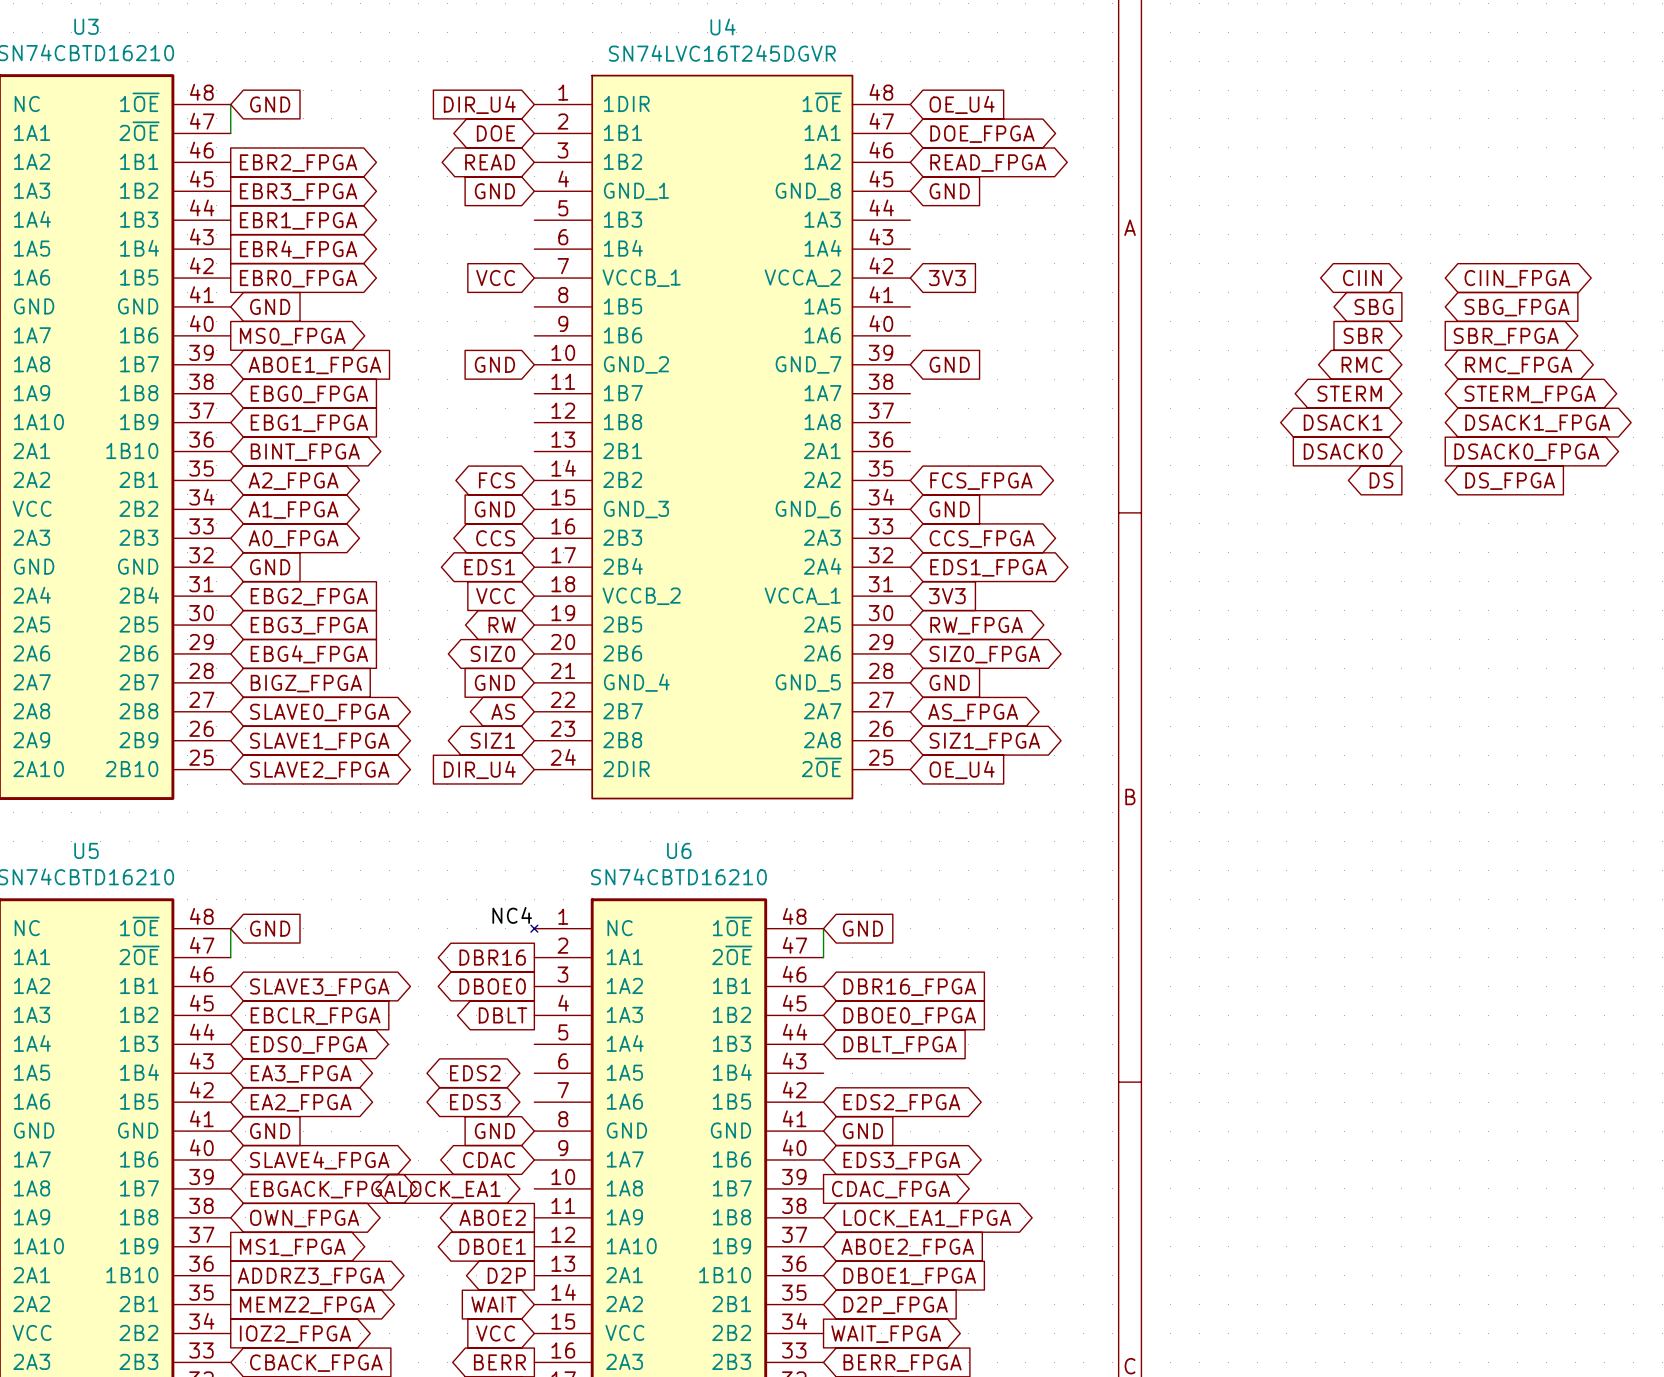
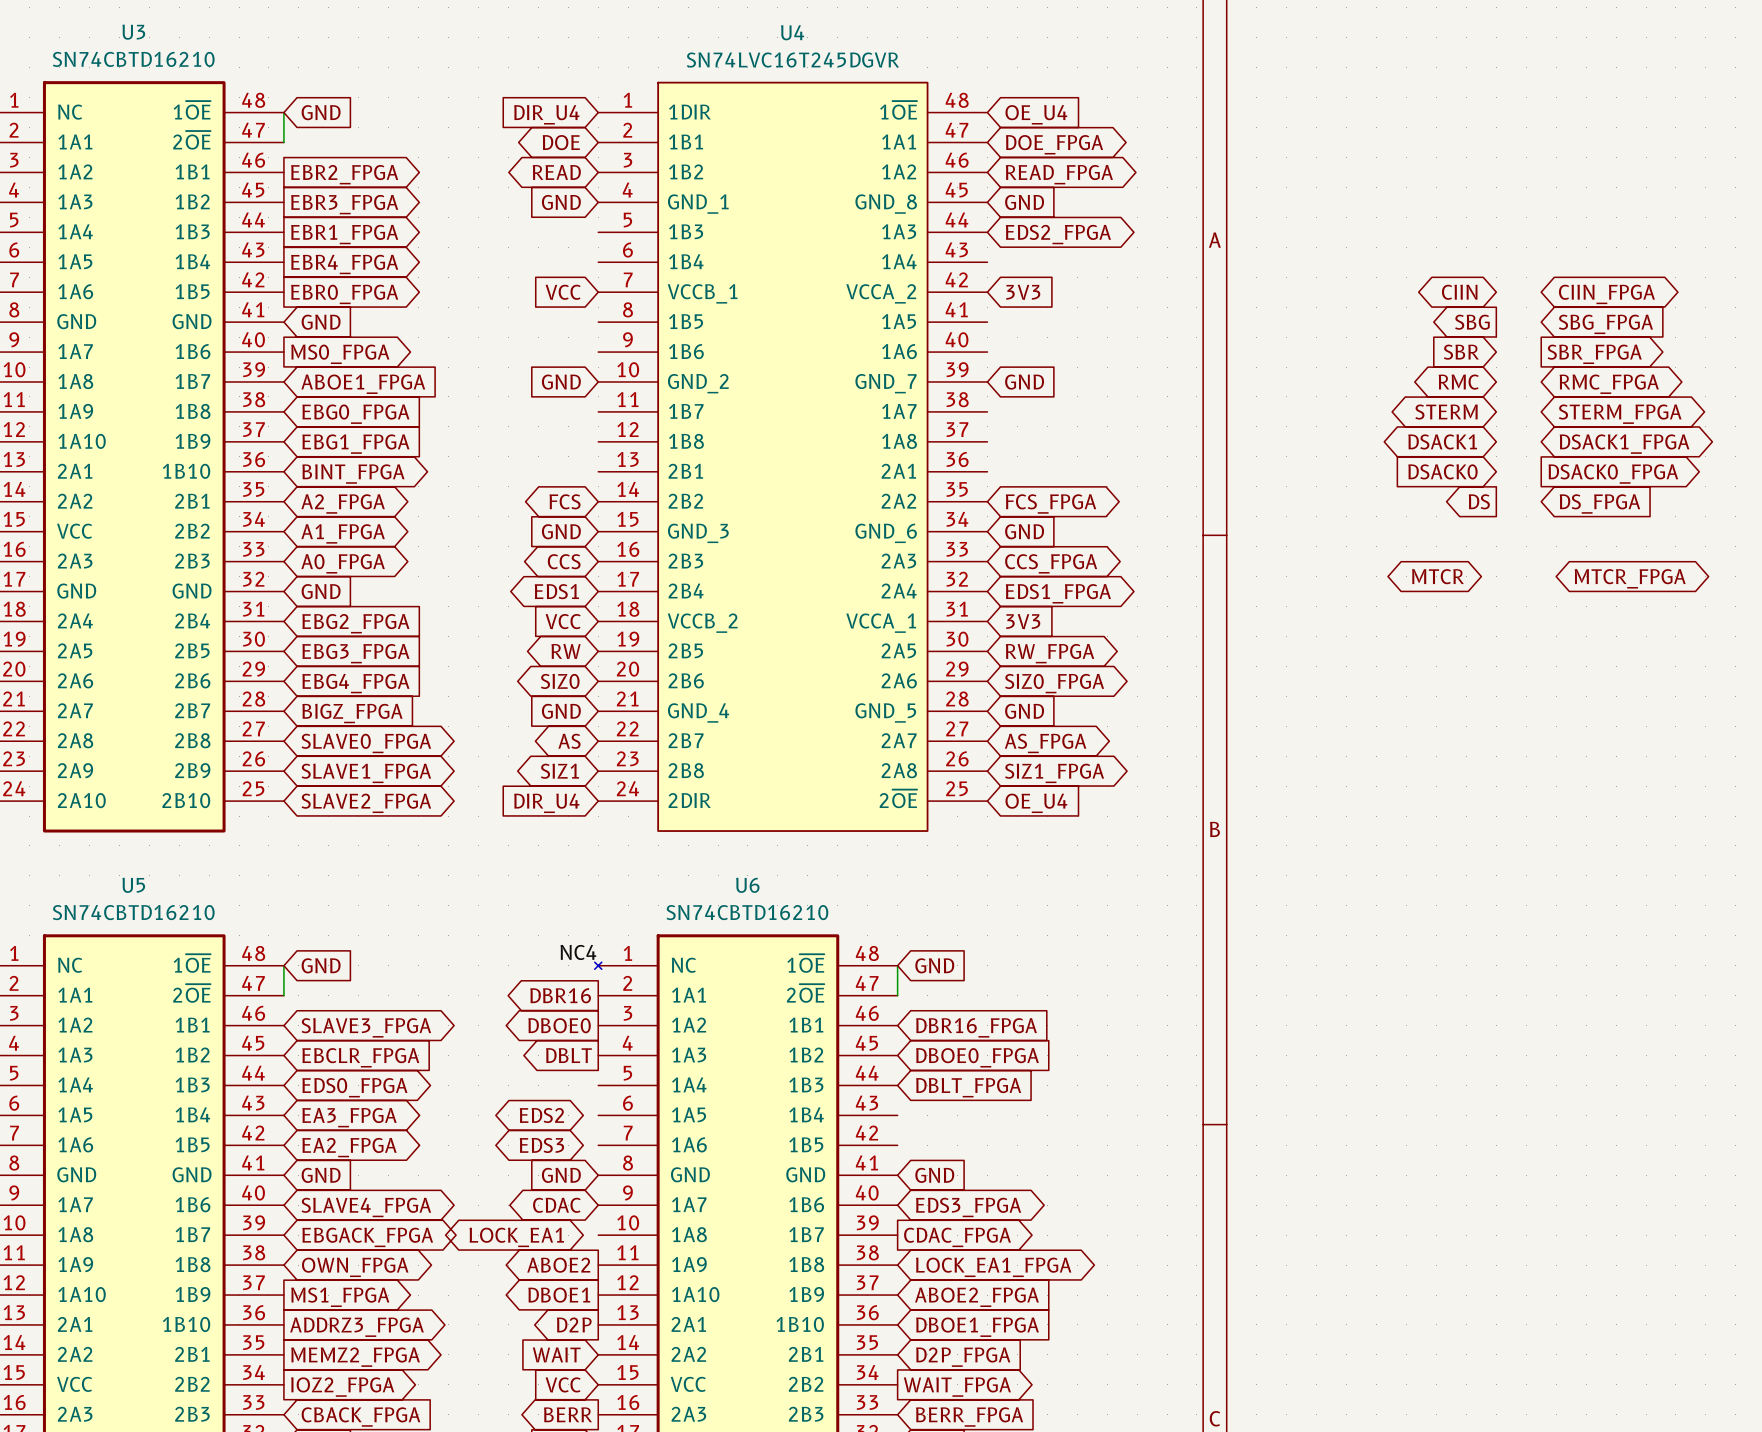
global label: none -> EDS2_FPGA (1058, 234)
global label: none -> MTCR (1437, 576)
global label: none -> MTCR_FPGA (1630, 578)
global label: EDS2_FPGA (901, 1102) -> none

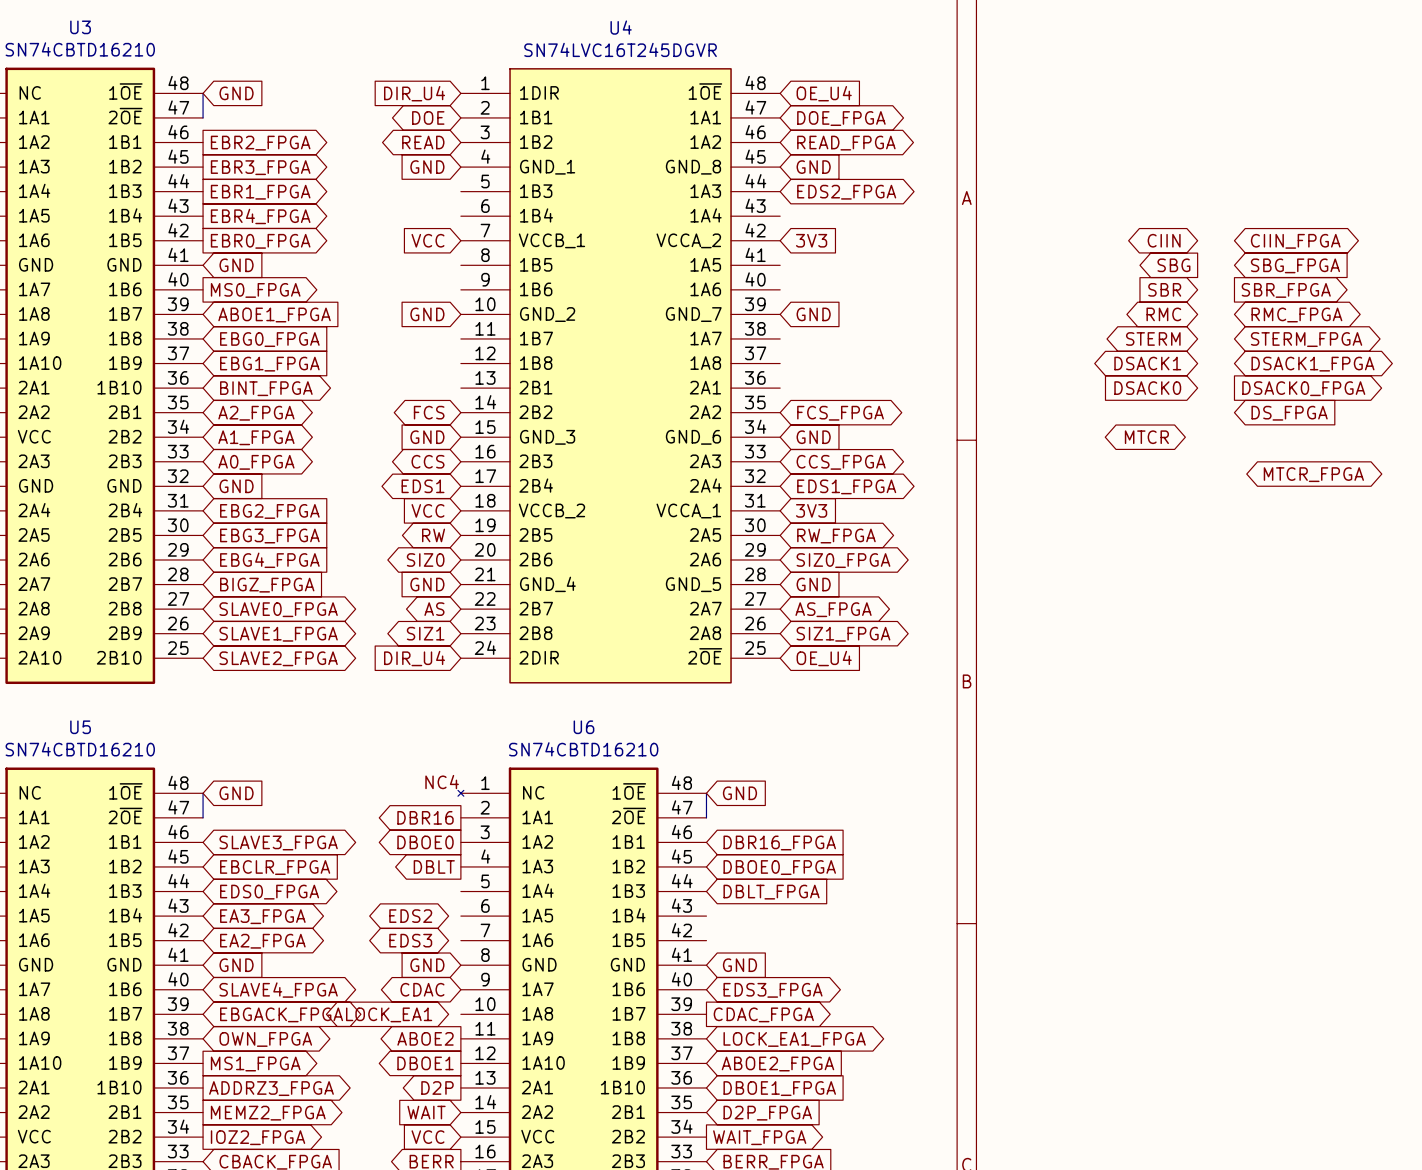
global label: DS (1479, 501) -> none
global label position: MTCR (1437, 576) -> MTCR (1146, 437)

